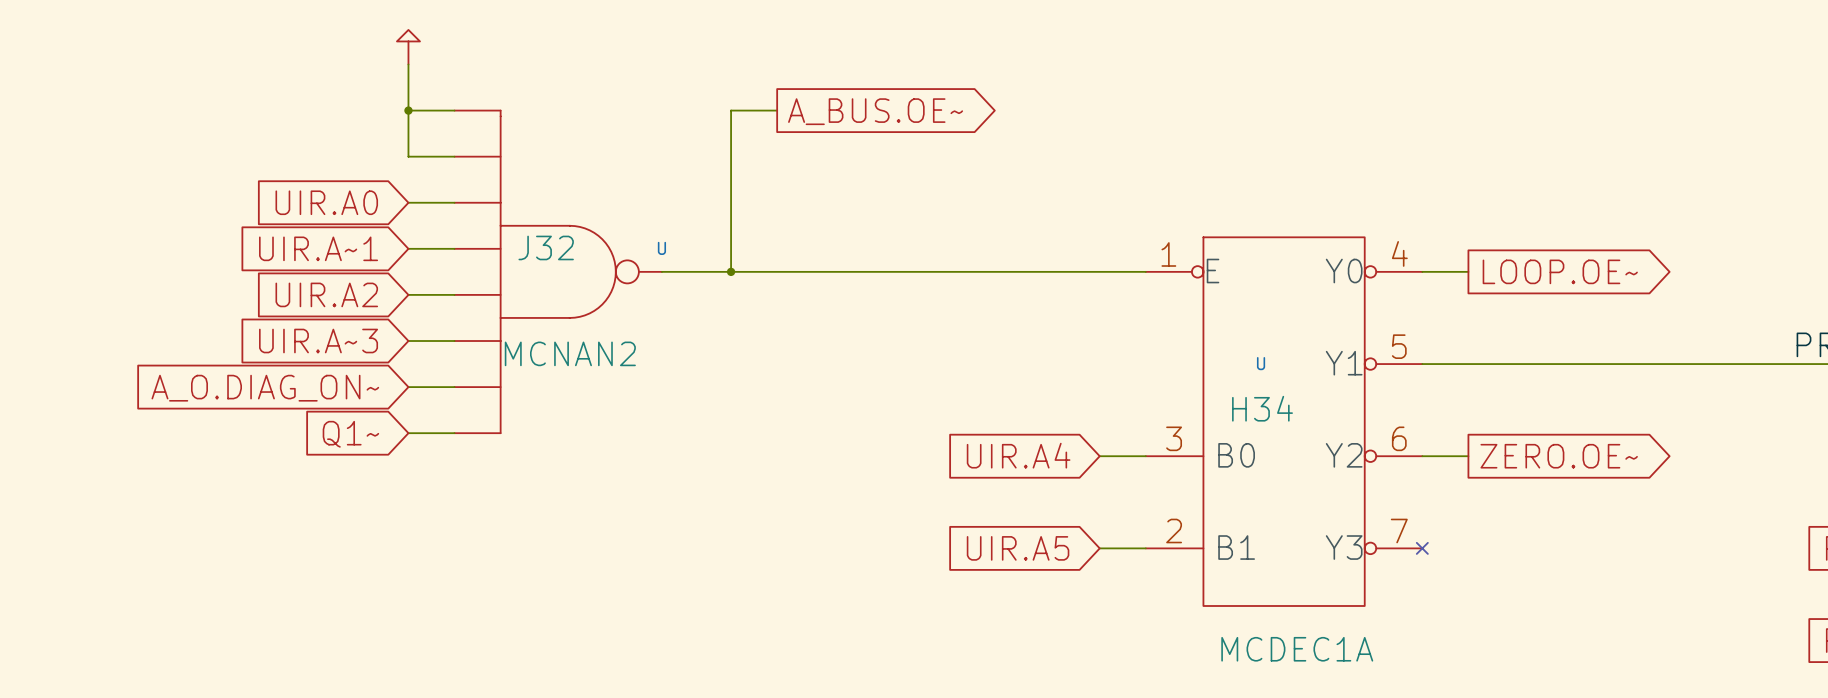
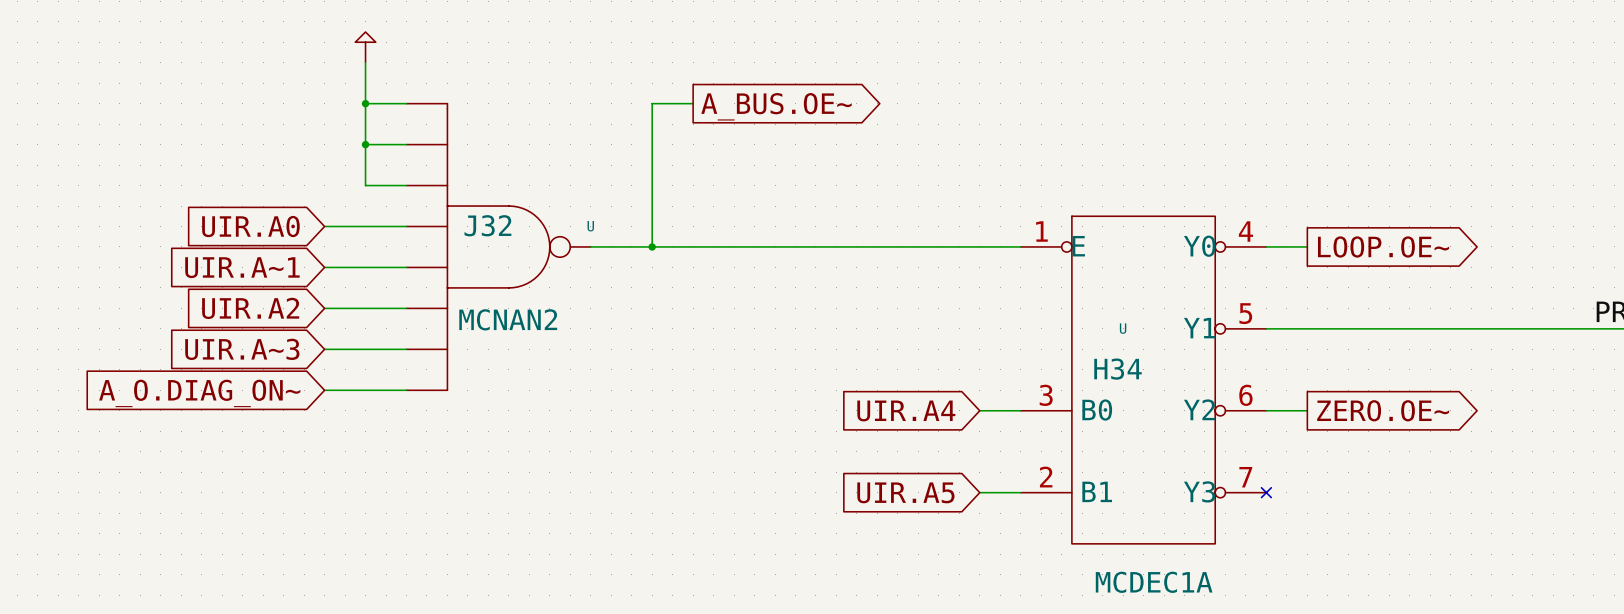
wire: none -> (365, 144) (365, 185)
junction: none -> (365, 144)
global label position: UIR.A0 (326, 202) -> UIR.A0 (250, 226)
global label position: UIR.A~1 (318, 248) -> UIR.A~1 (242, 267)
wire: none -> (324, 226) (365, 226)
global label position: UIR.A2 (326, 294) -> UIR.A2 (250, 308)
wire: none -> (324, 267) (365, 267)
global label position: UIR.A~3 (318, 341) -> UIR.A~3 (242, 349)
wire: none -> (324, 308) (365, 308)
wire: none -> (324, 349) (365, 349)
global label position: A_O.DIAG_ON~ (265, 388) -> A_O.DIAG_ON~ (199, 393)
wire: none -> (324, 390) (365, 390)
global label: Q1~ (350, 434) -> none

